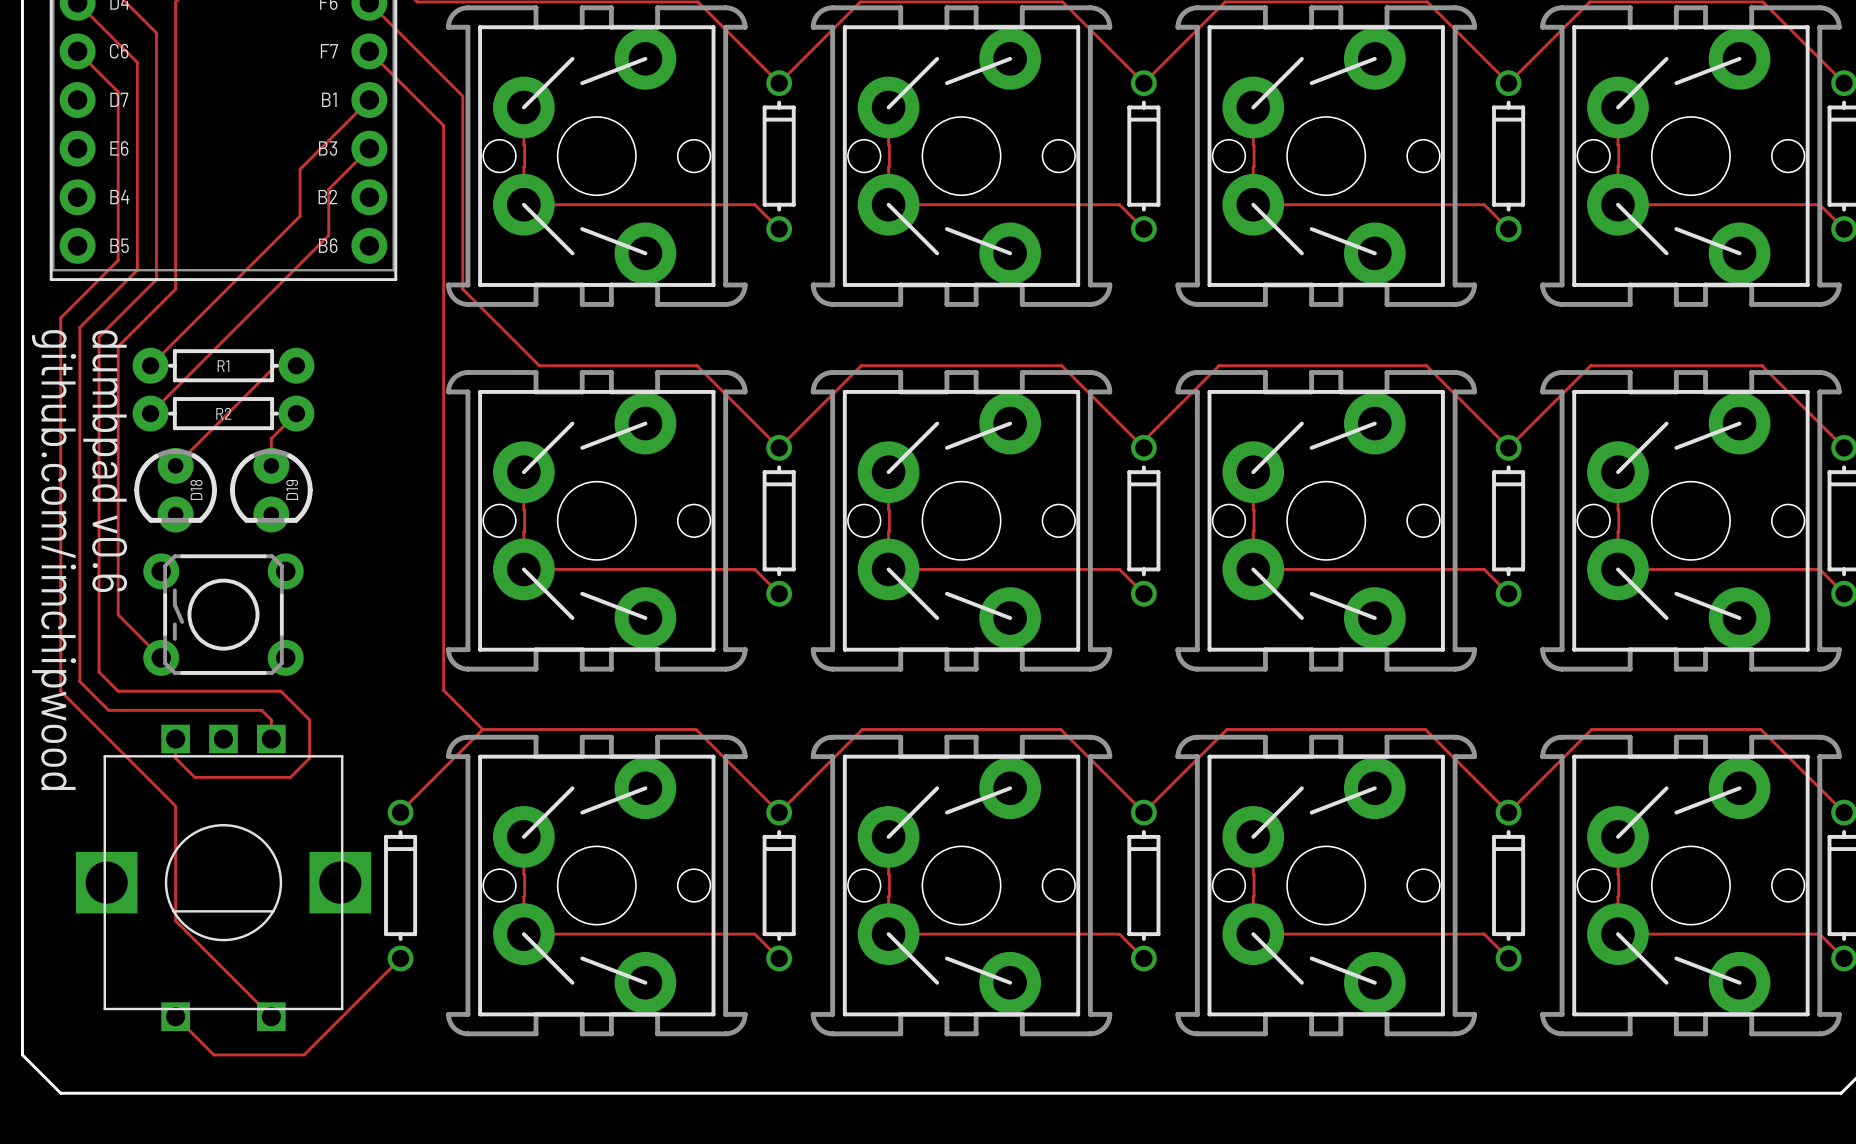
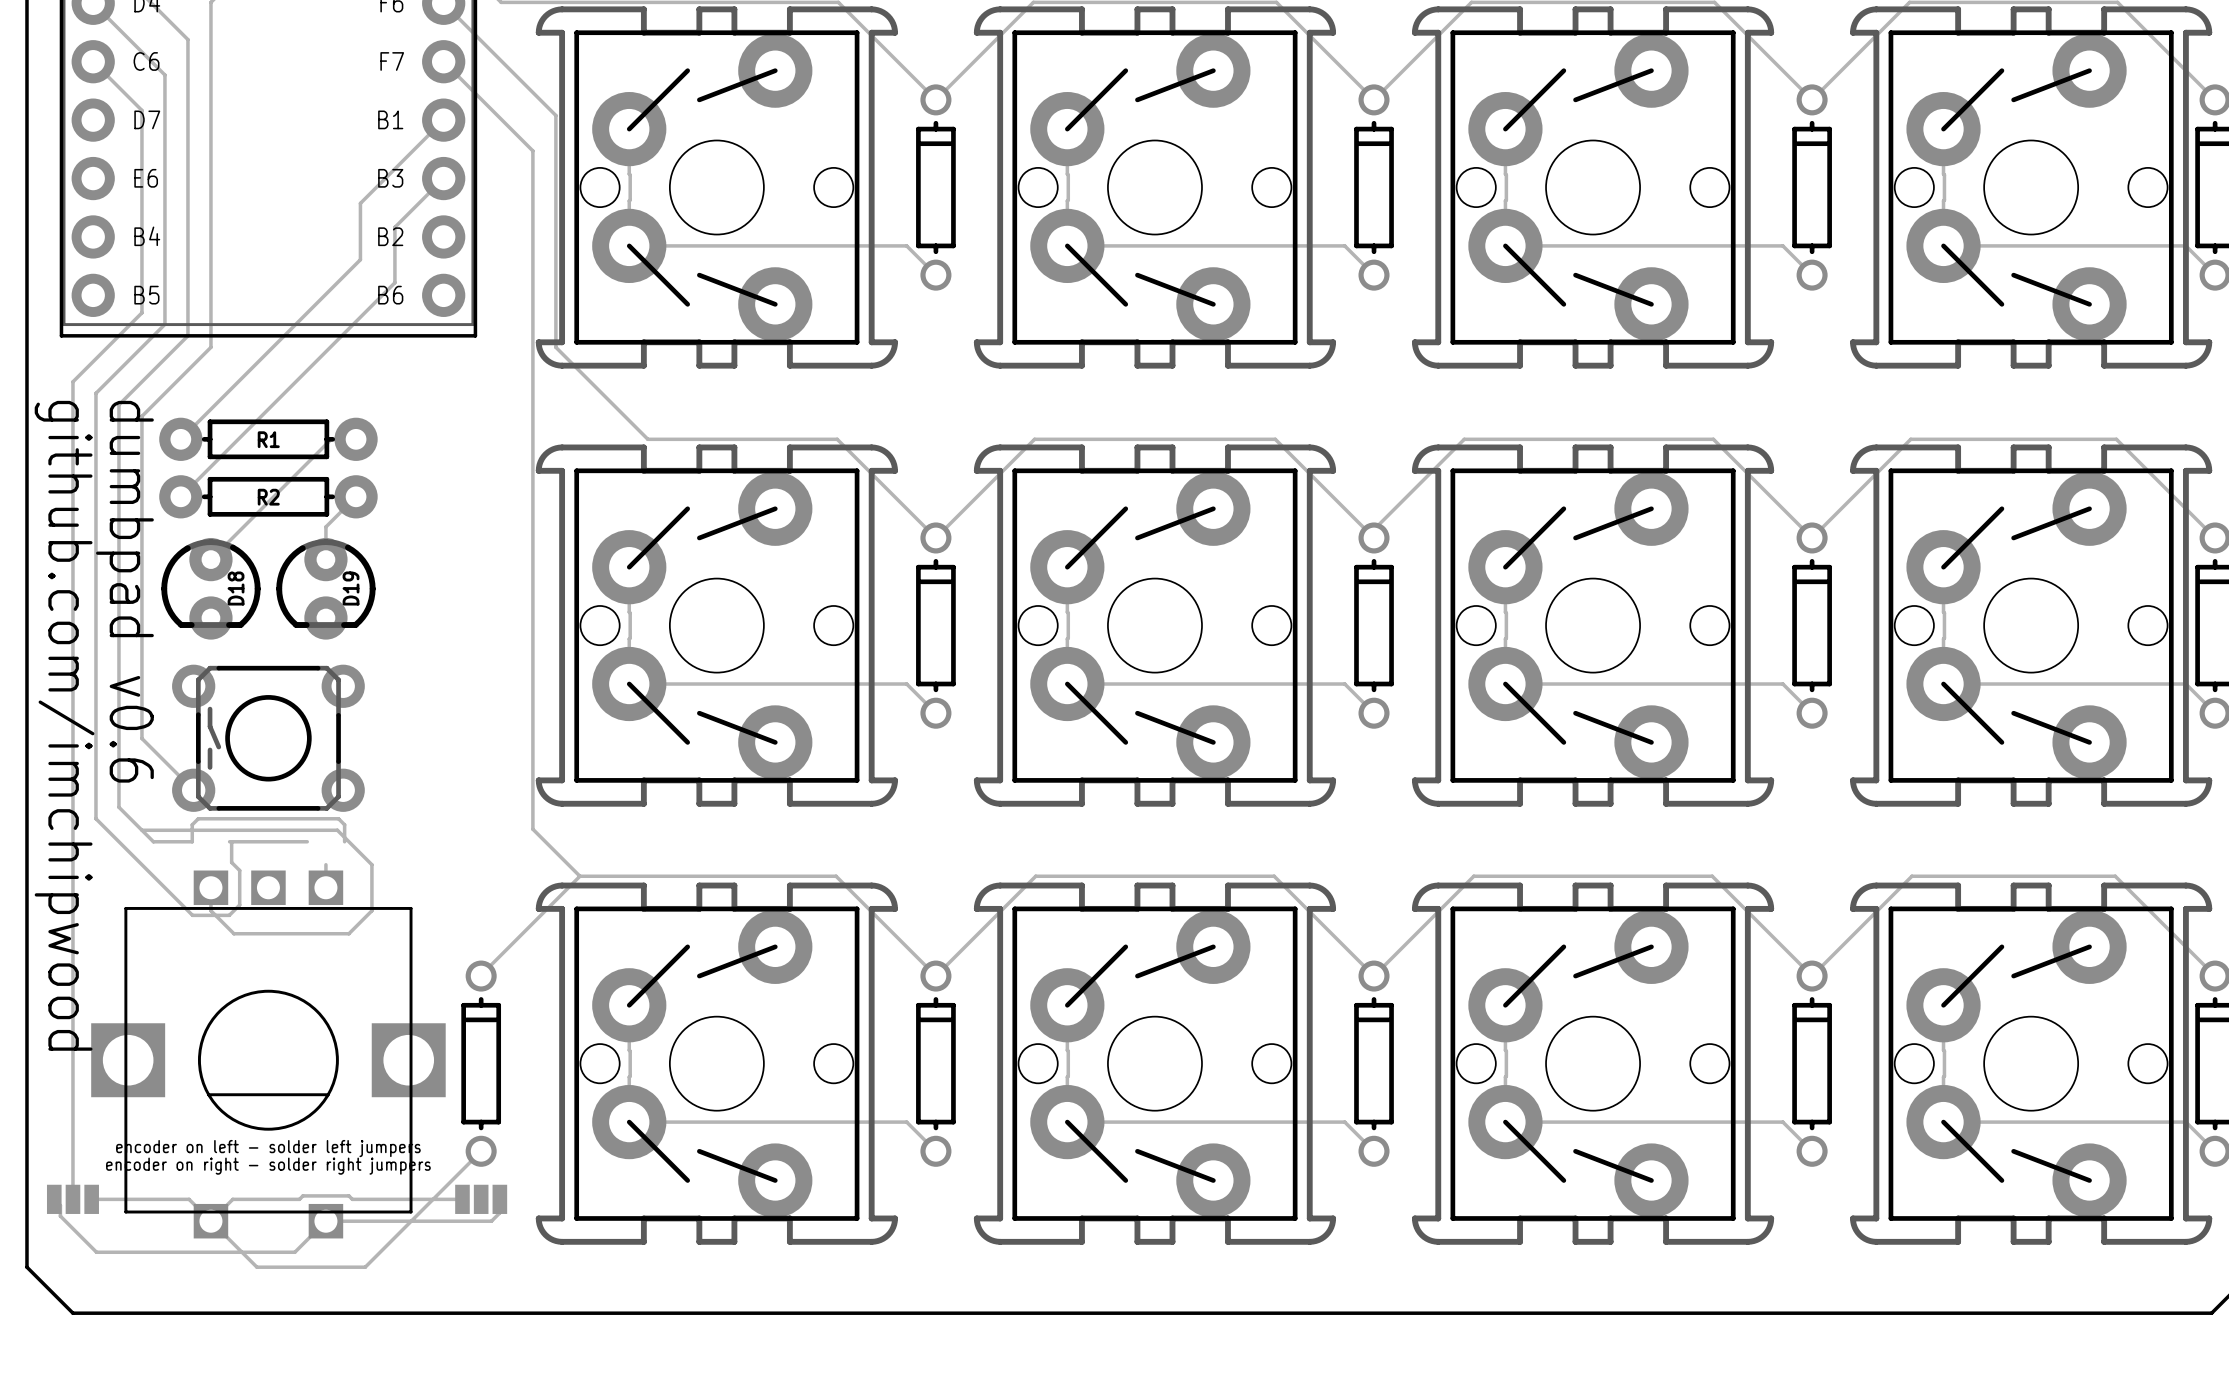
track: (60, 691) (175, 806) (175, 920) (271, 1016) -> (72, 830) (72, 1199)
track: none -> (141, 830) (153, 841) (192, 841) (192, 824) (198, 818) (338, 818) (344, 824) (344, 841)
track: none -> (229, 841) (307, 841)
track: (108, 710) (261, 710) (271, 719) -> (130, 853) (192, 915) (229, 915) (239, 905) (239, 870) (231, 862) (231, 841)
text: none -> encoder on left - solder left jumpers (268, 1148)
text: none -> encoder on right - solder right jumpers (268, 1166)
track: none -> (54, 1199) (60, 1205) (60, 1216) (96, 1252) (294, 1252) (325, 1221) (491, 1221) (499, 1212) (499, 1199)
part: none -> (72, 1199)
track: none -> (91, 1199) (189, 1199) (210, 1221) (232, 1199) (299, 1199) (302, 1195) (348, 1195) (352, 1199) (462, 1199)
part: none -> (481, 1199)

